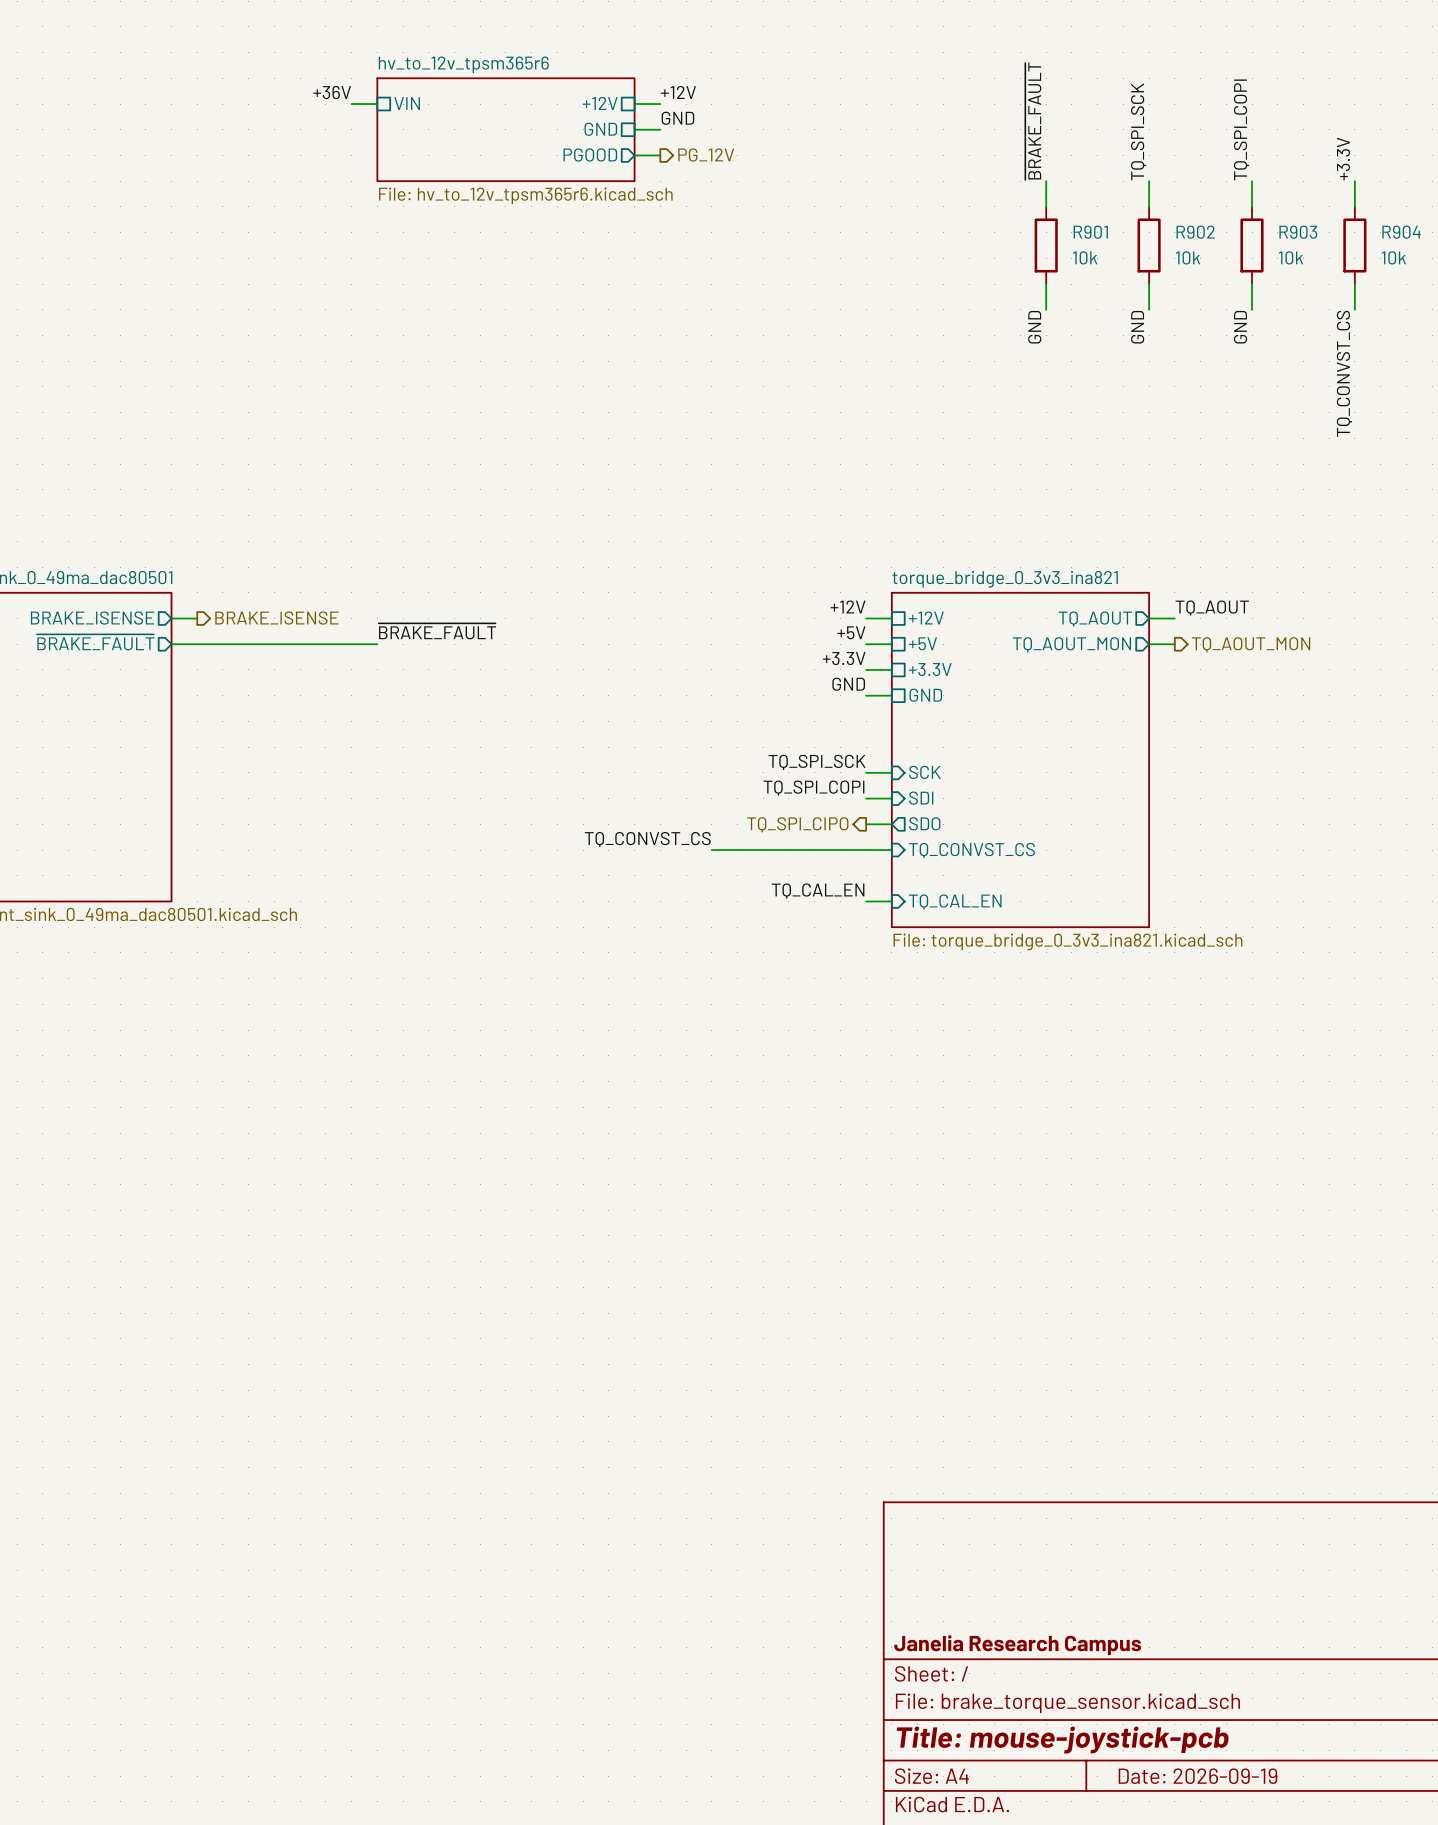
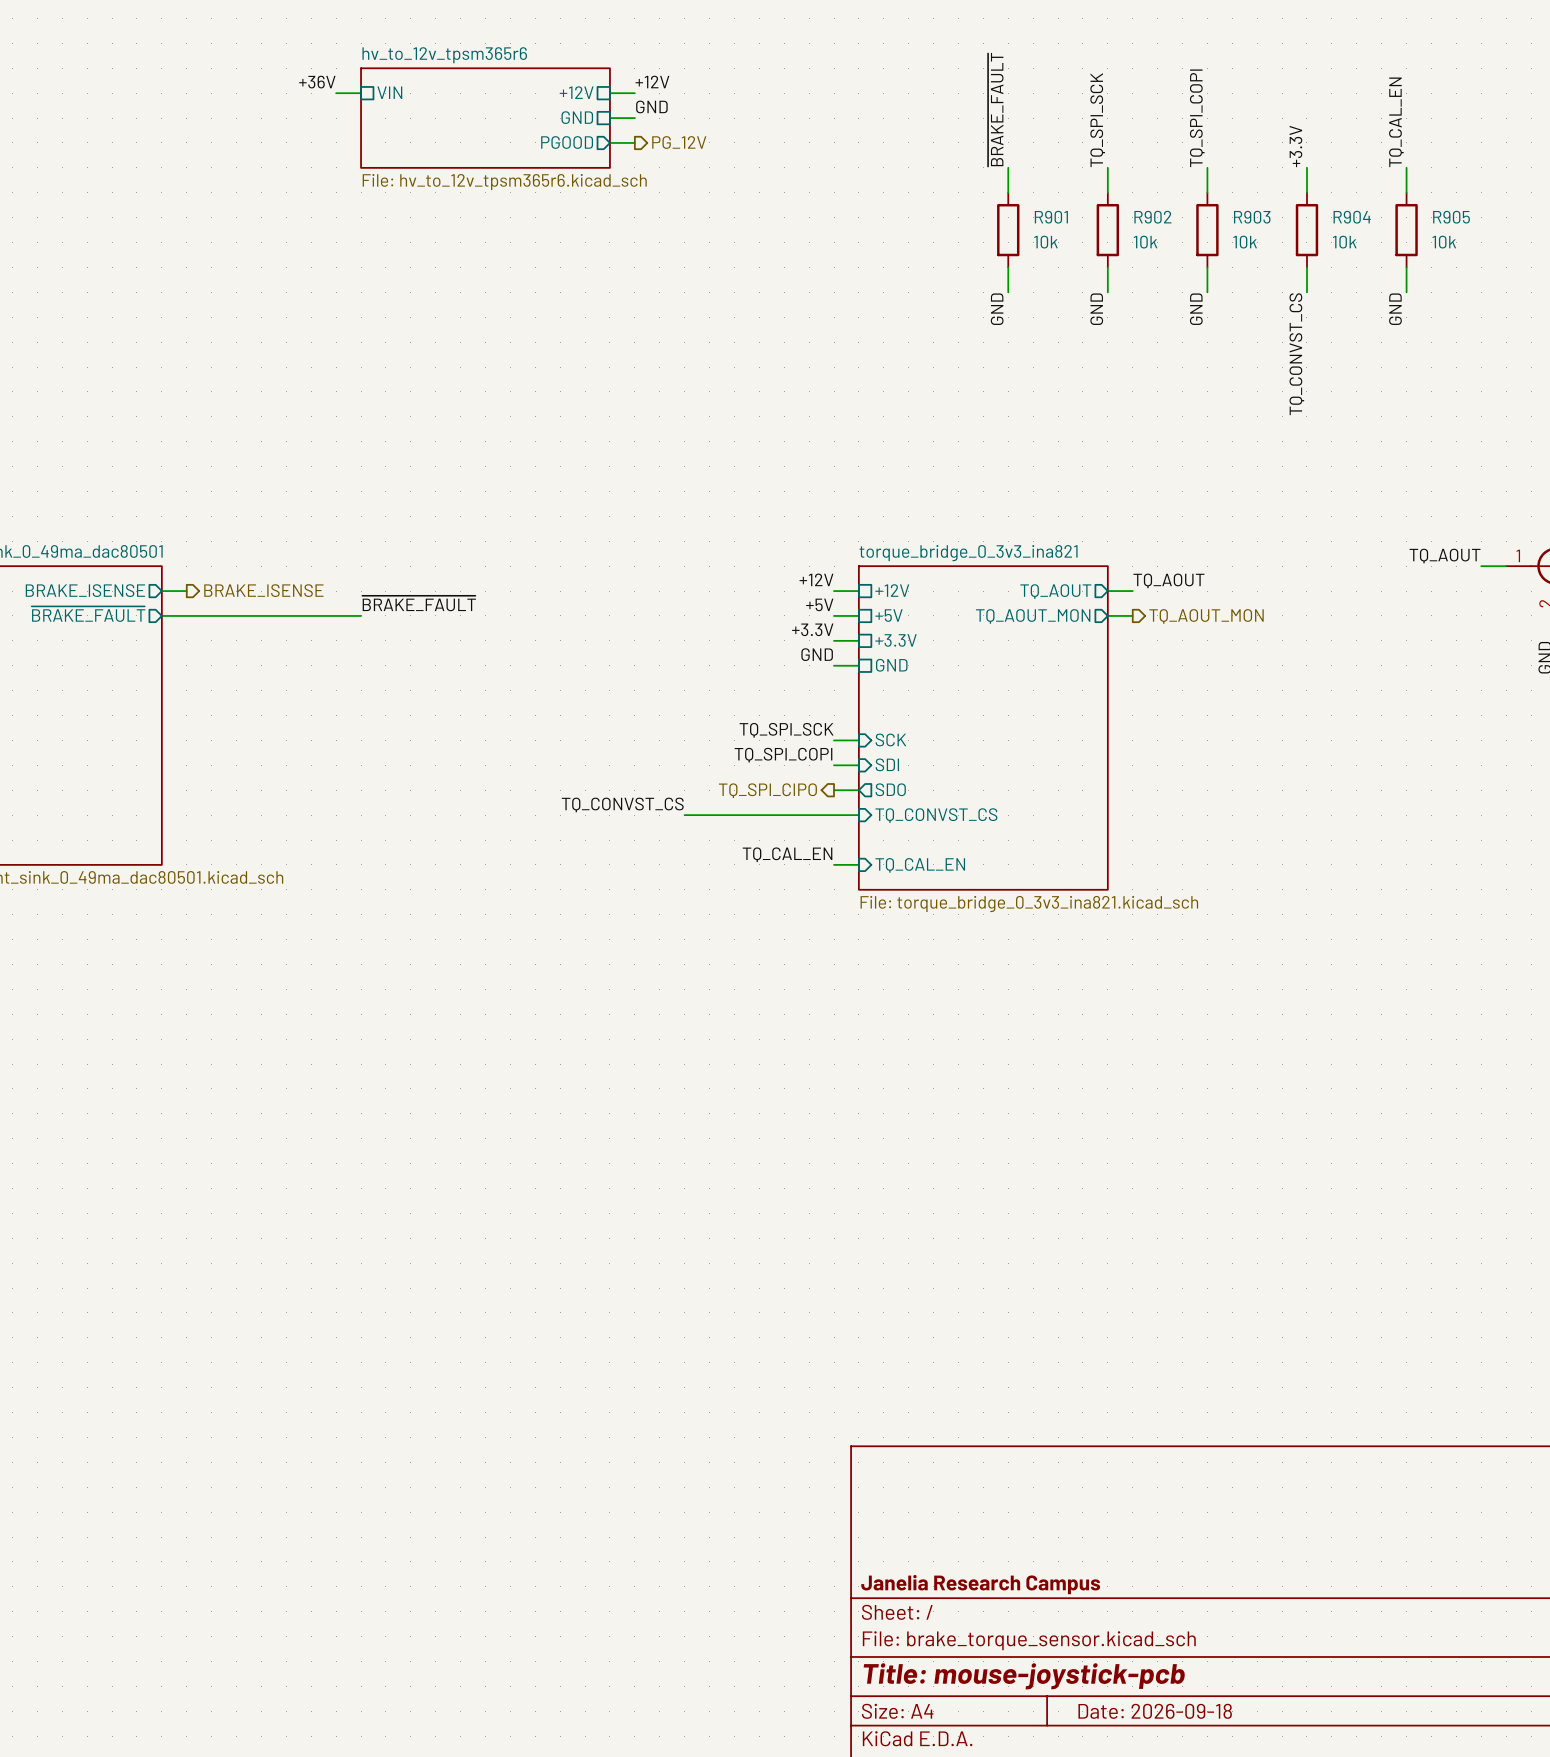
title block: Date: 2026-09-19 (1197, 1776) -> Date: 2026-09-18 (1155, 1711)

